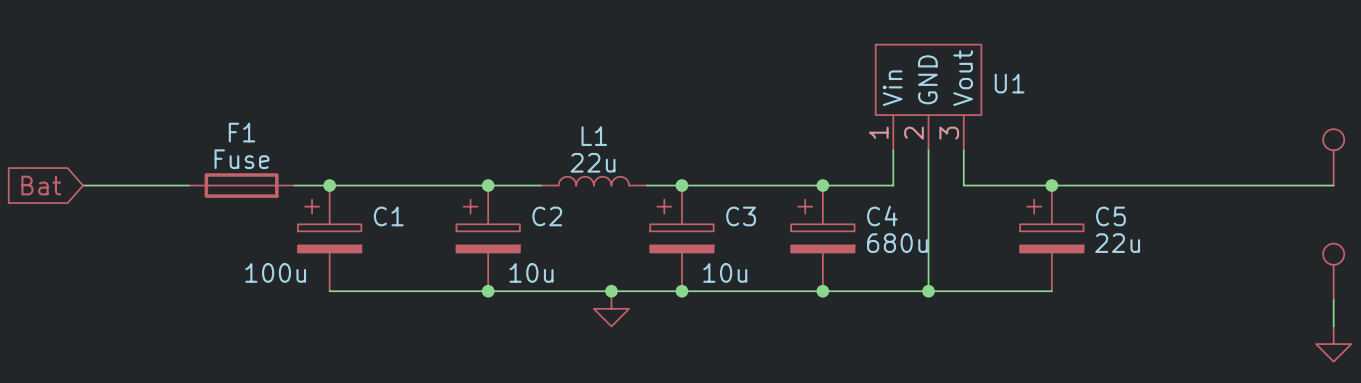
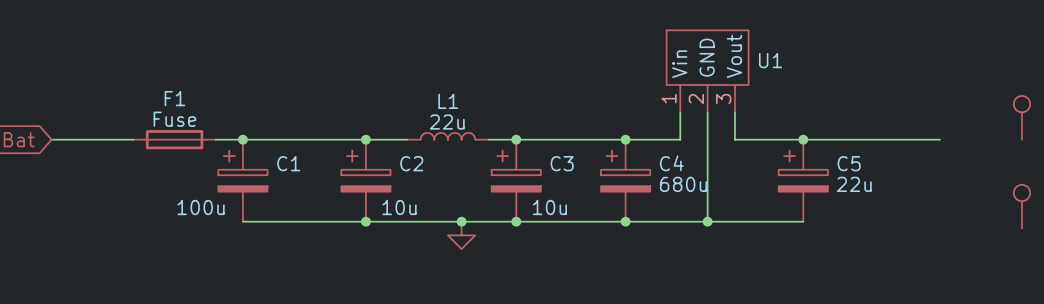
wire: (1227, 185) (1333, 185) -> none
wire: (1333, 300) (1333, 326) -> none
power symbol: (1333, 344) -> none

